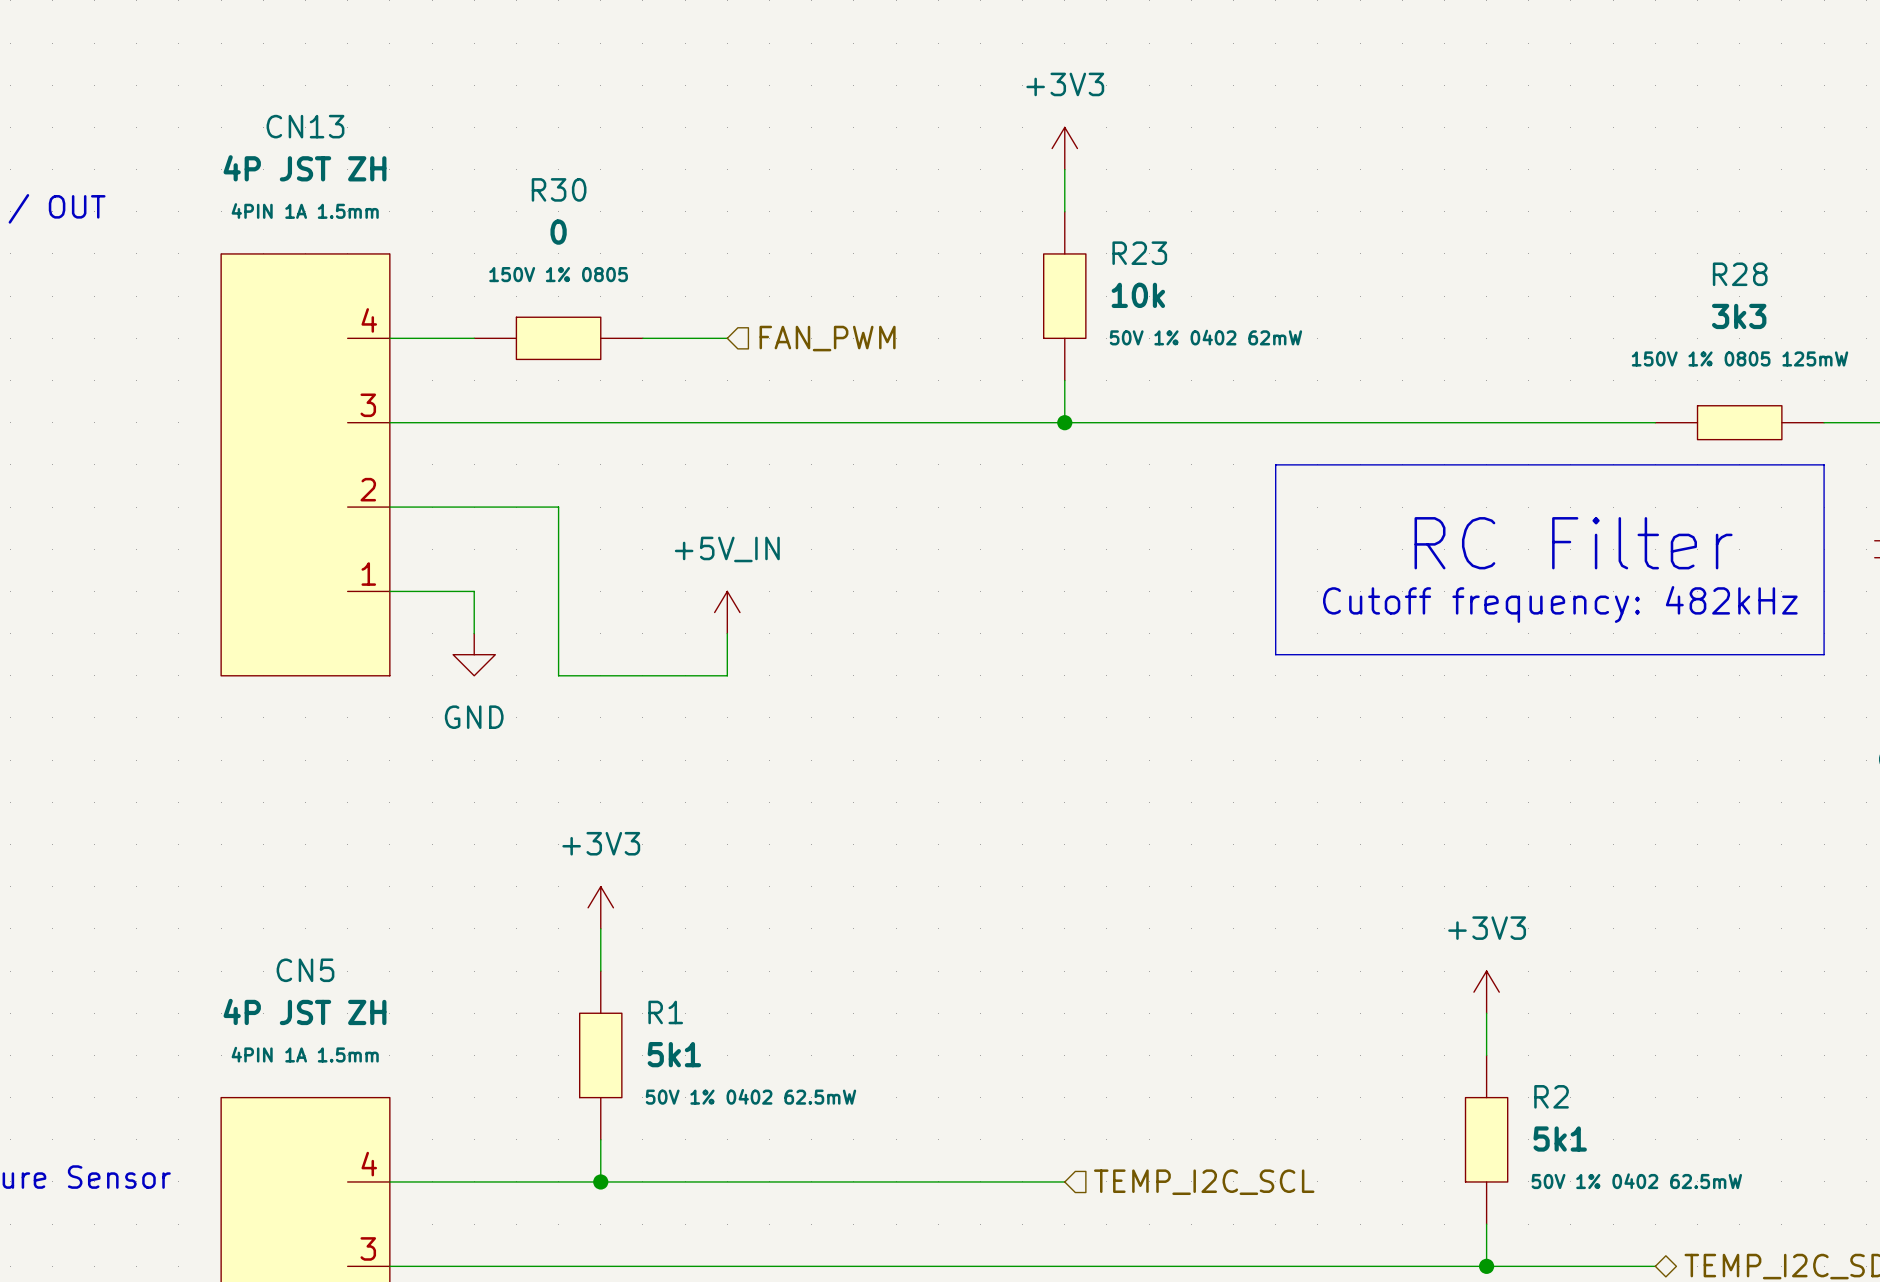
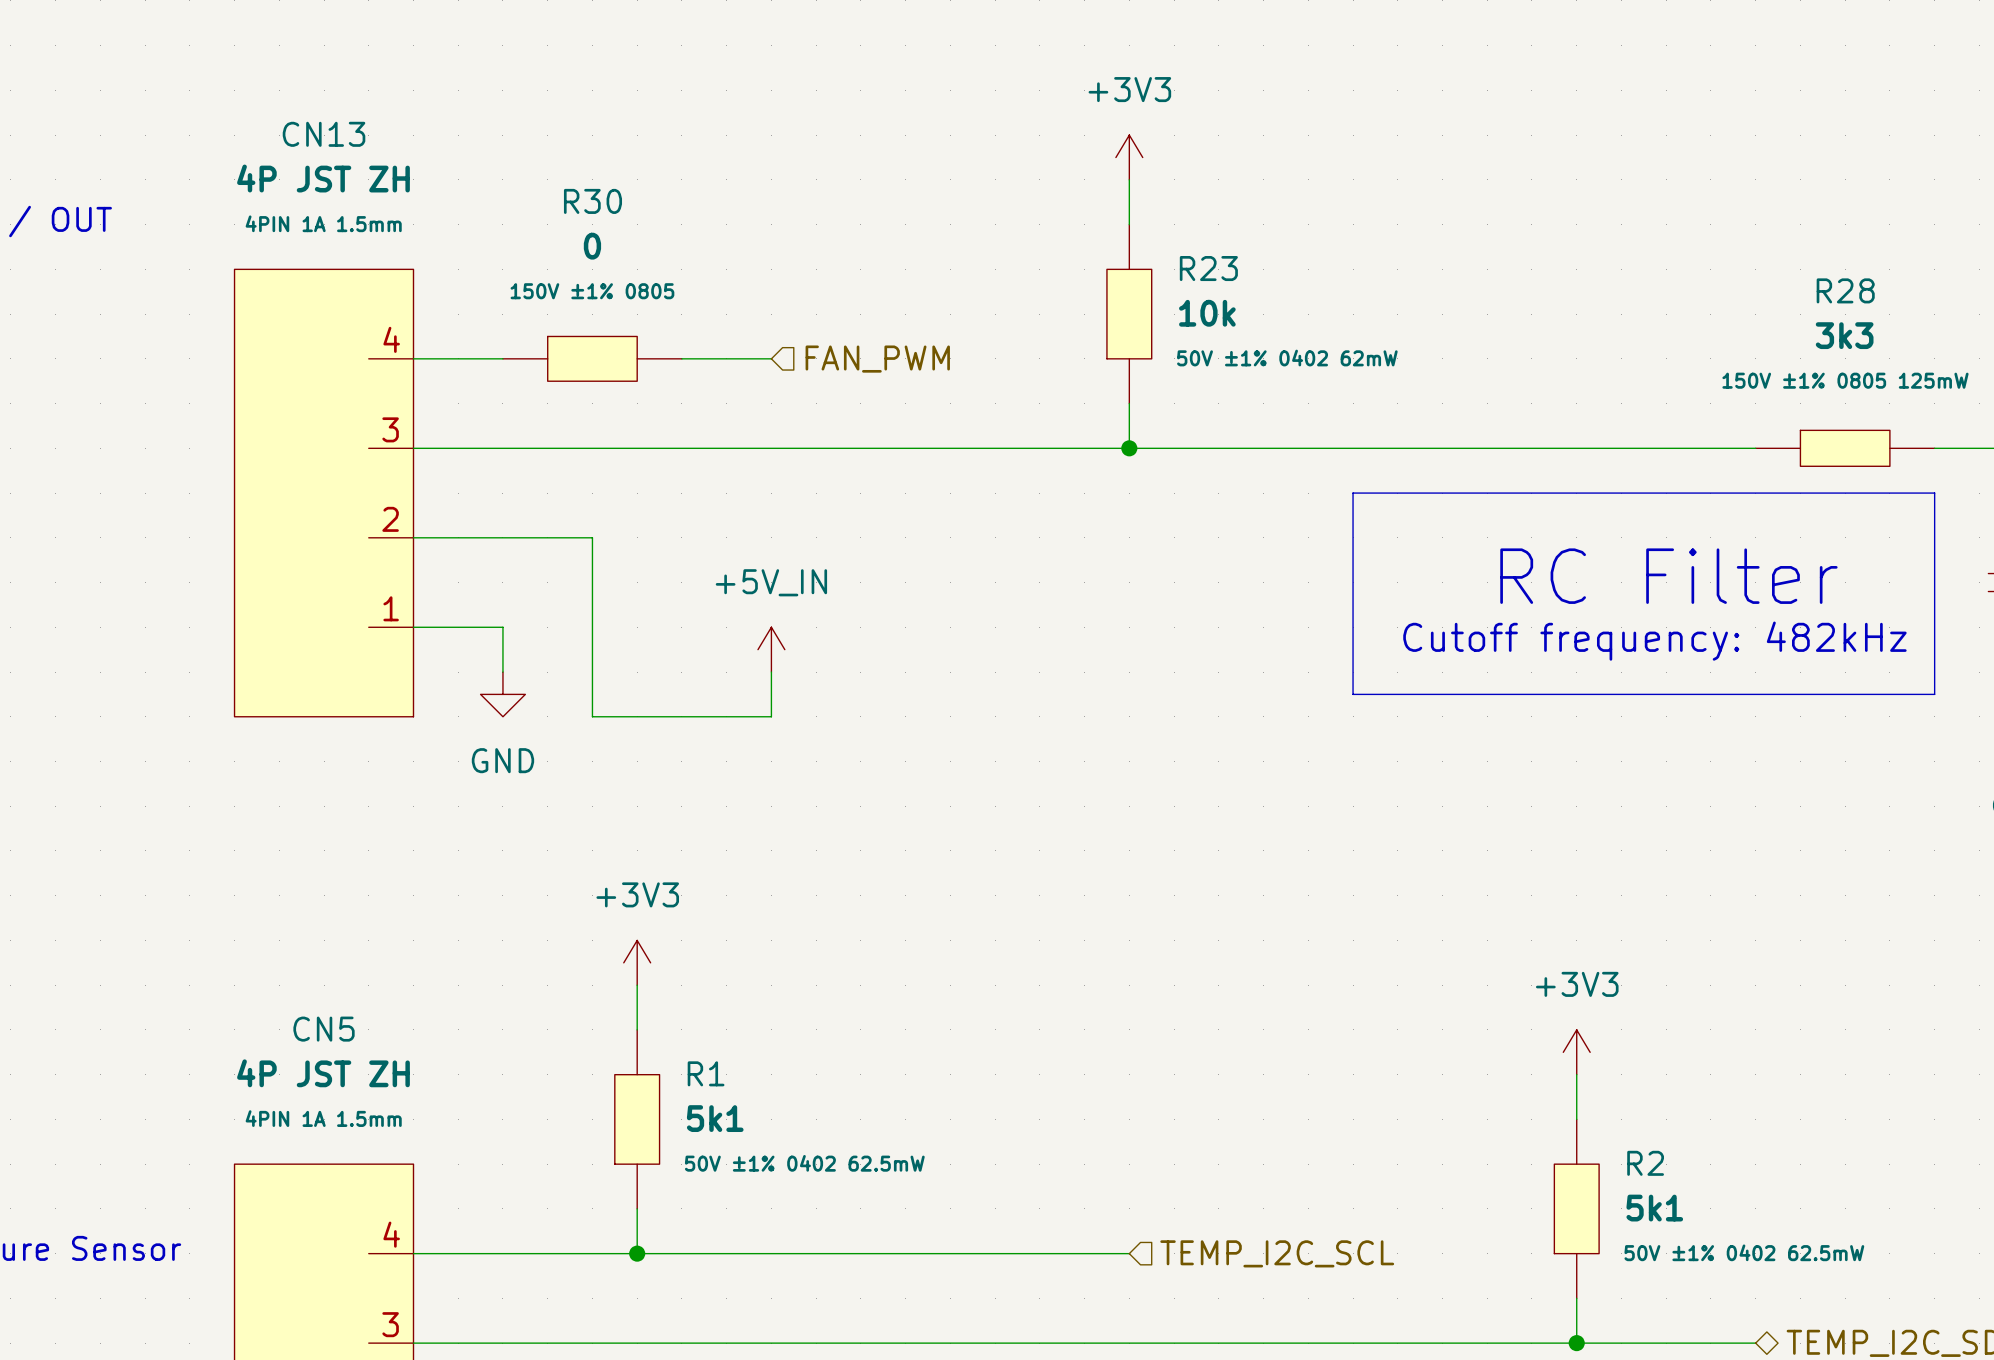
R30 text: 150V 1% 0805 (558, 274) -> 150V ±1% 0805 (592, 291)
R23 text: 50V 1% 0402 62mW (1205, 337) -> 50V ±1% 0402 62mW (1287, 358)
R28 text: 150V 1% 0805 125mW (1740, 358) -> 150V ±1% 0805 125mW (1845, 380)
R1 text: 50V 1% 0402 62.5mW (750, 1096) -> 50V ±1% 0402 62.5mW (804, 1163)
R2 text: 50V 1% 0402 62.5mW (1636, 1181) -> 50V ±1% 0402 62.5mW (1744, 1252)

